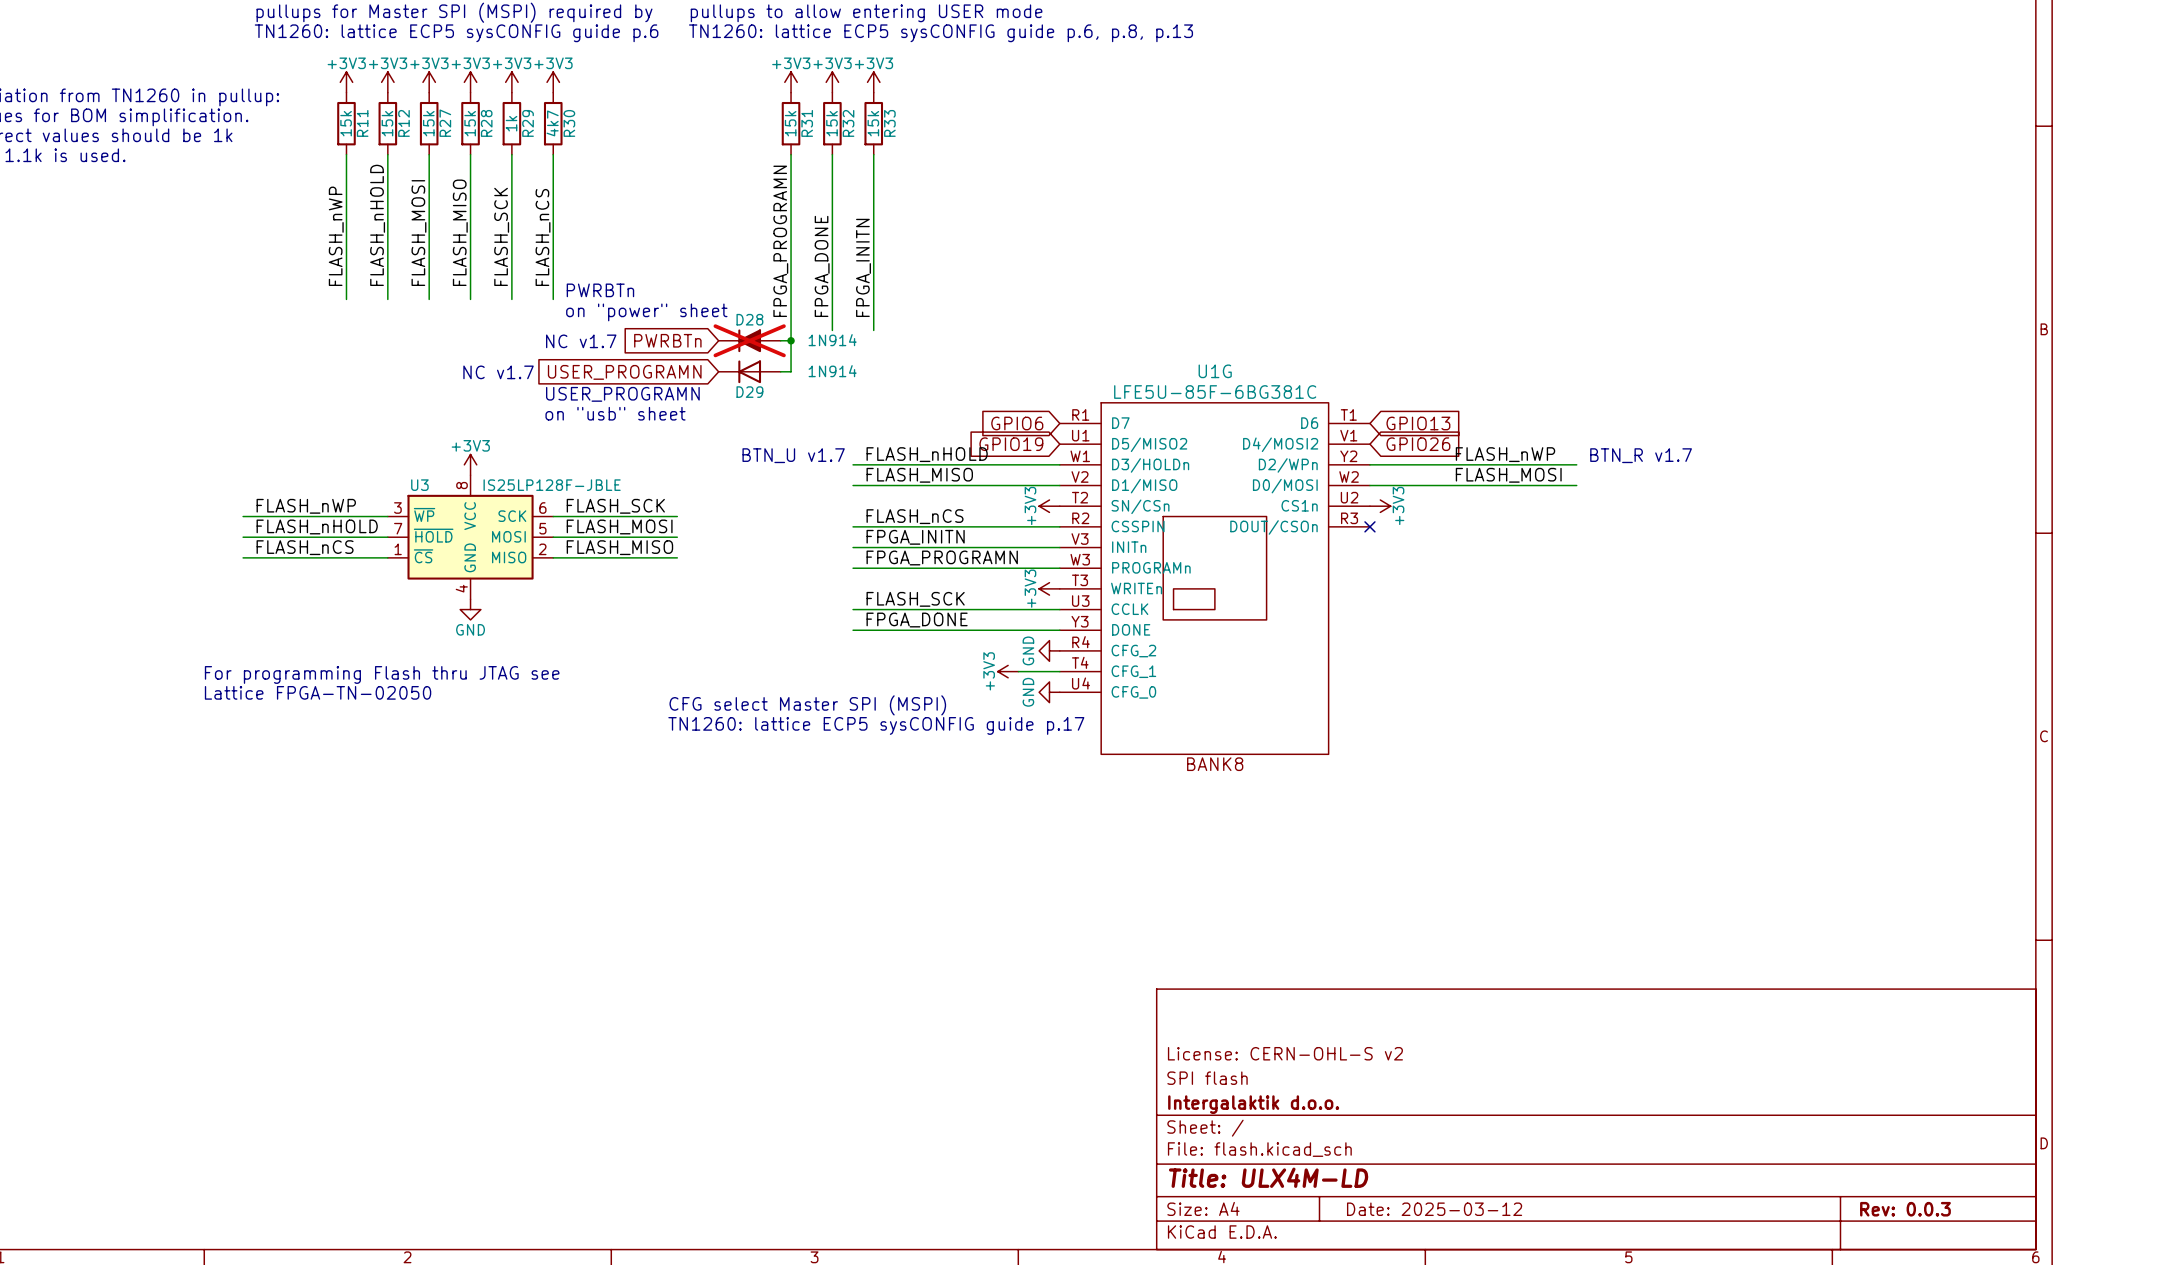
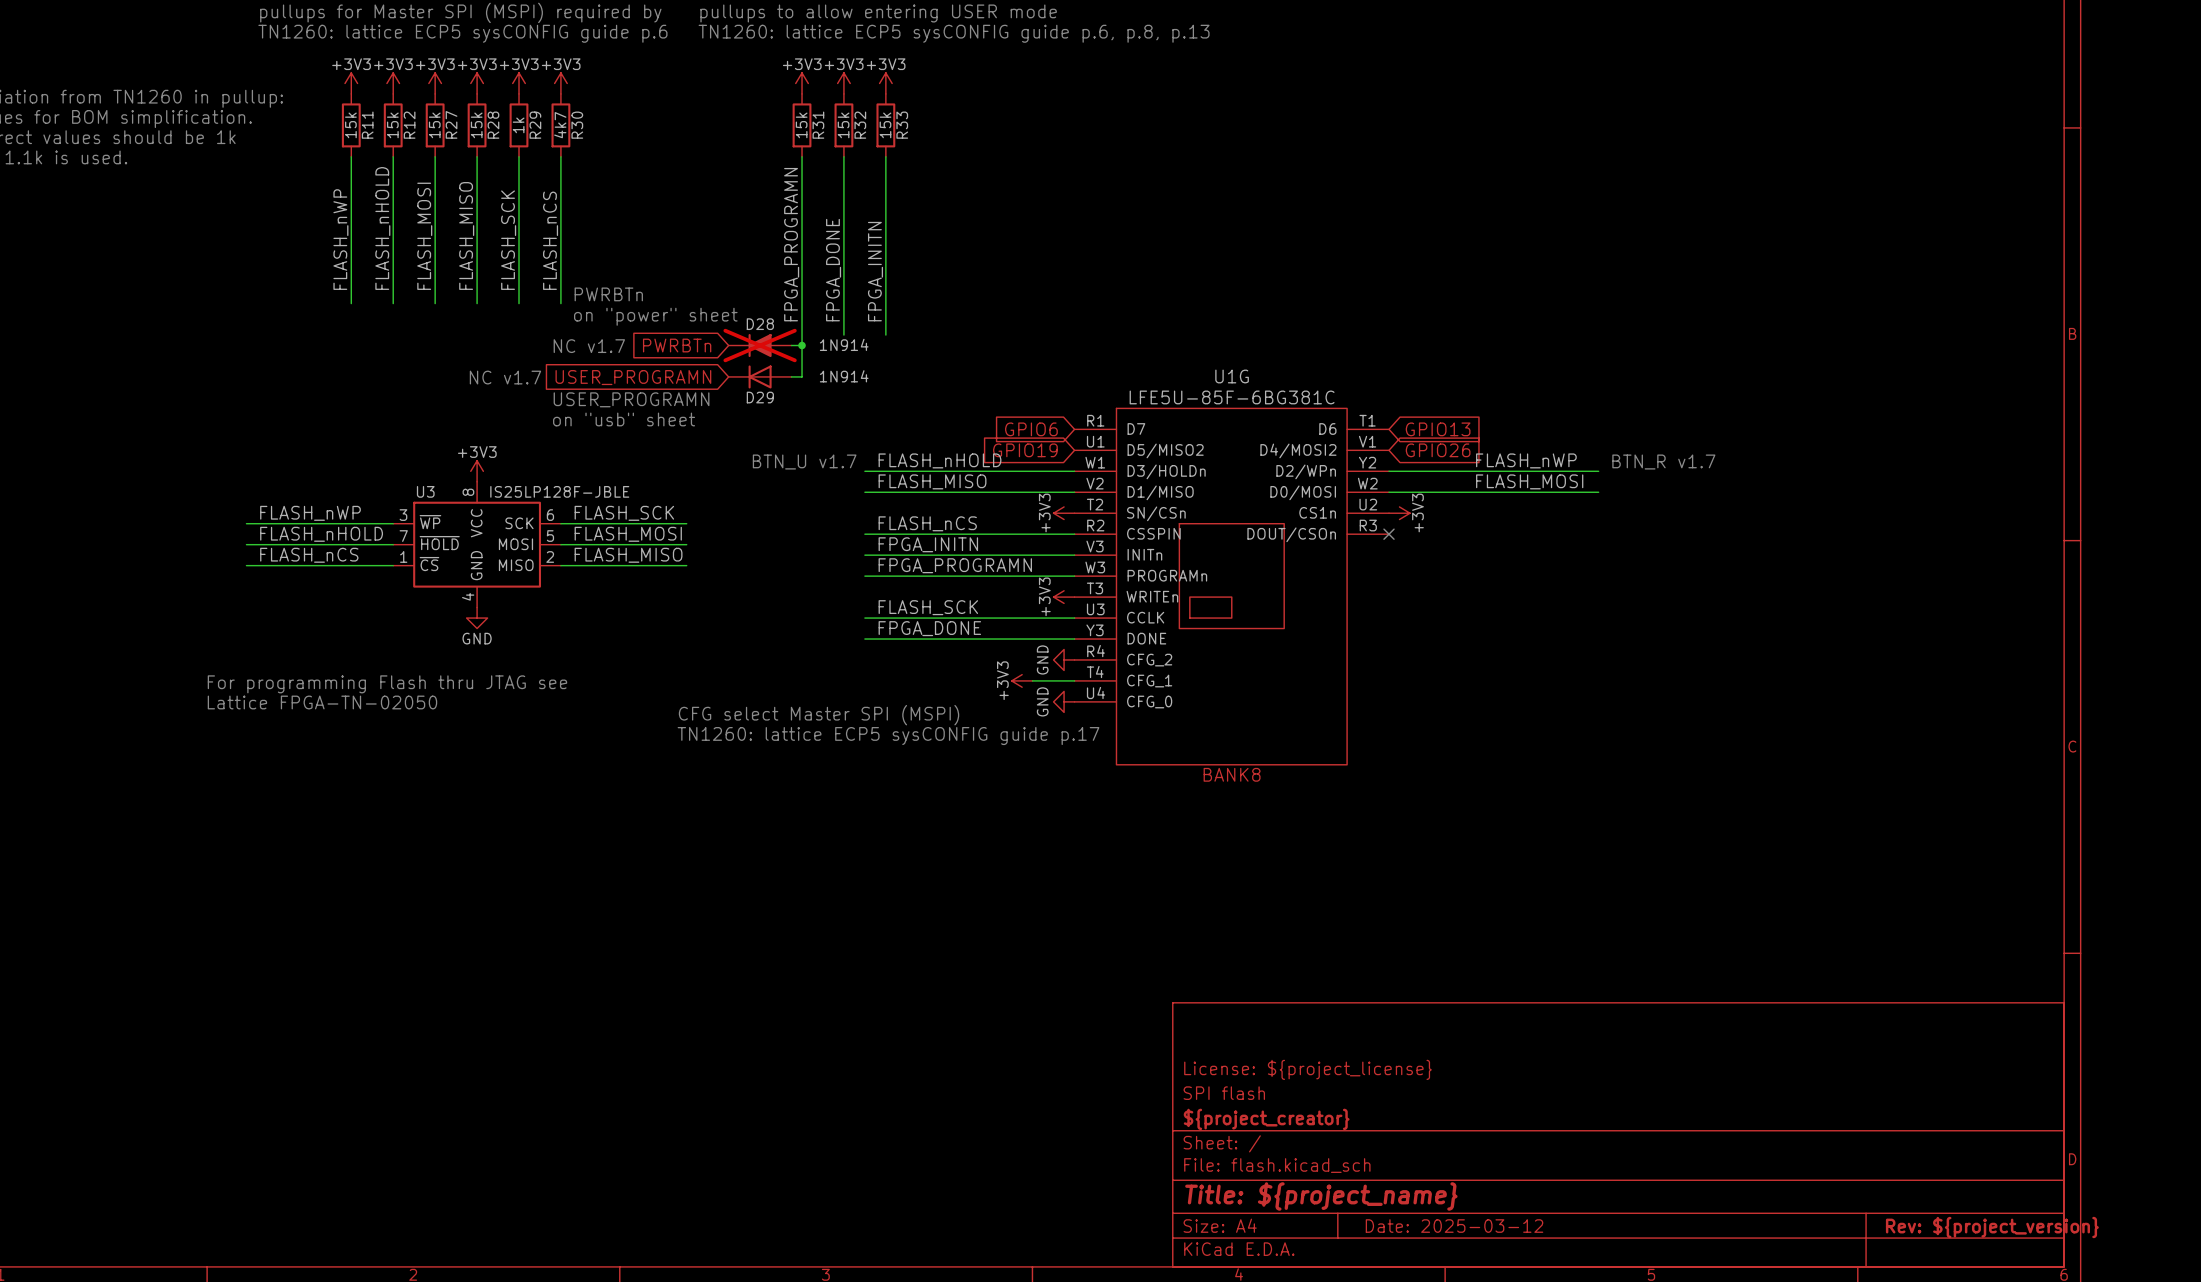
title block: License: CERN-OHL-S v2 (1285, 1053) -> License: ${project_license} (1308, 1069)
title block: Intergalaktik d.o.o. (1253, 1104) -> ${project_creator} (1266, 1119)
title block: Title: ULX4M-LD (1268, 1177) -> Title: ${project_name} (1321, 1196)
title block: Rev: 0.0.3 (1905, 1209) -> Rev: ${project_version} (1992, 1227)

